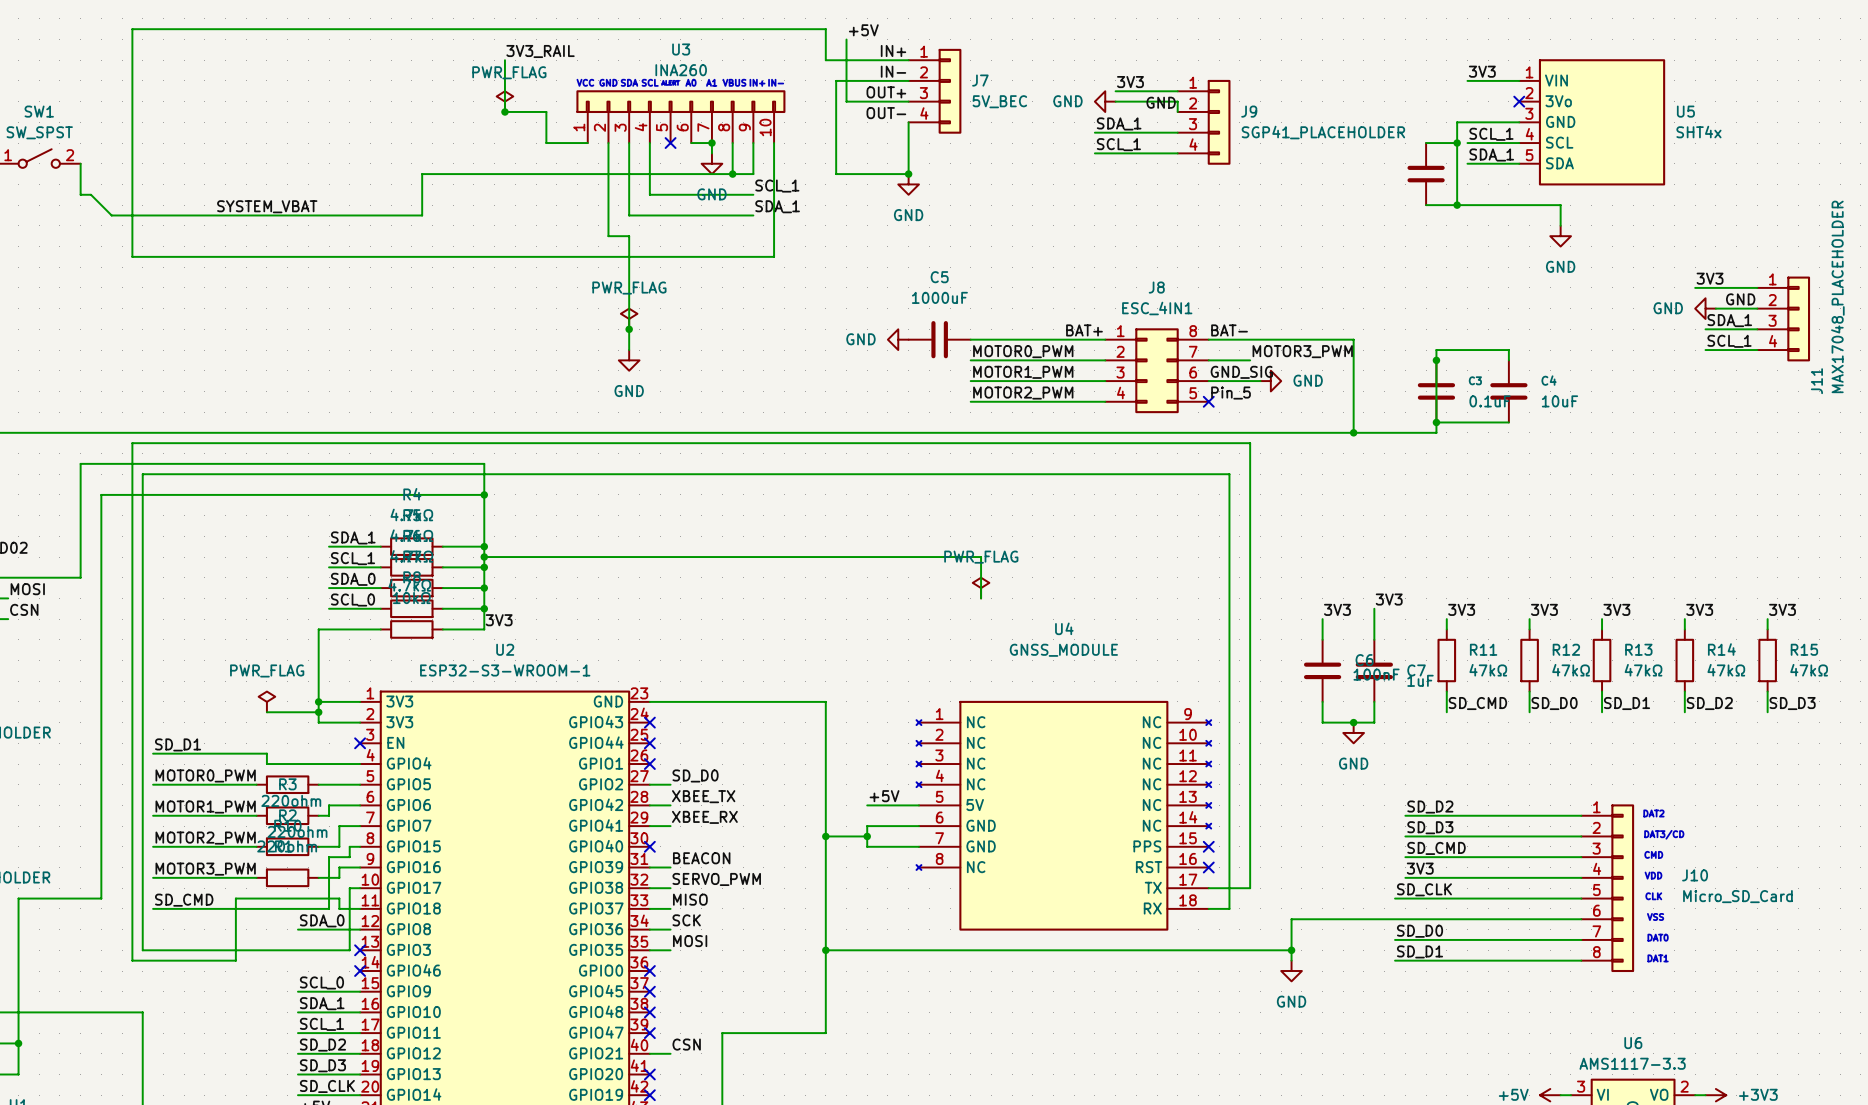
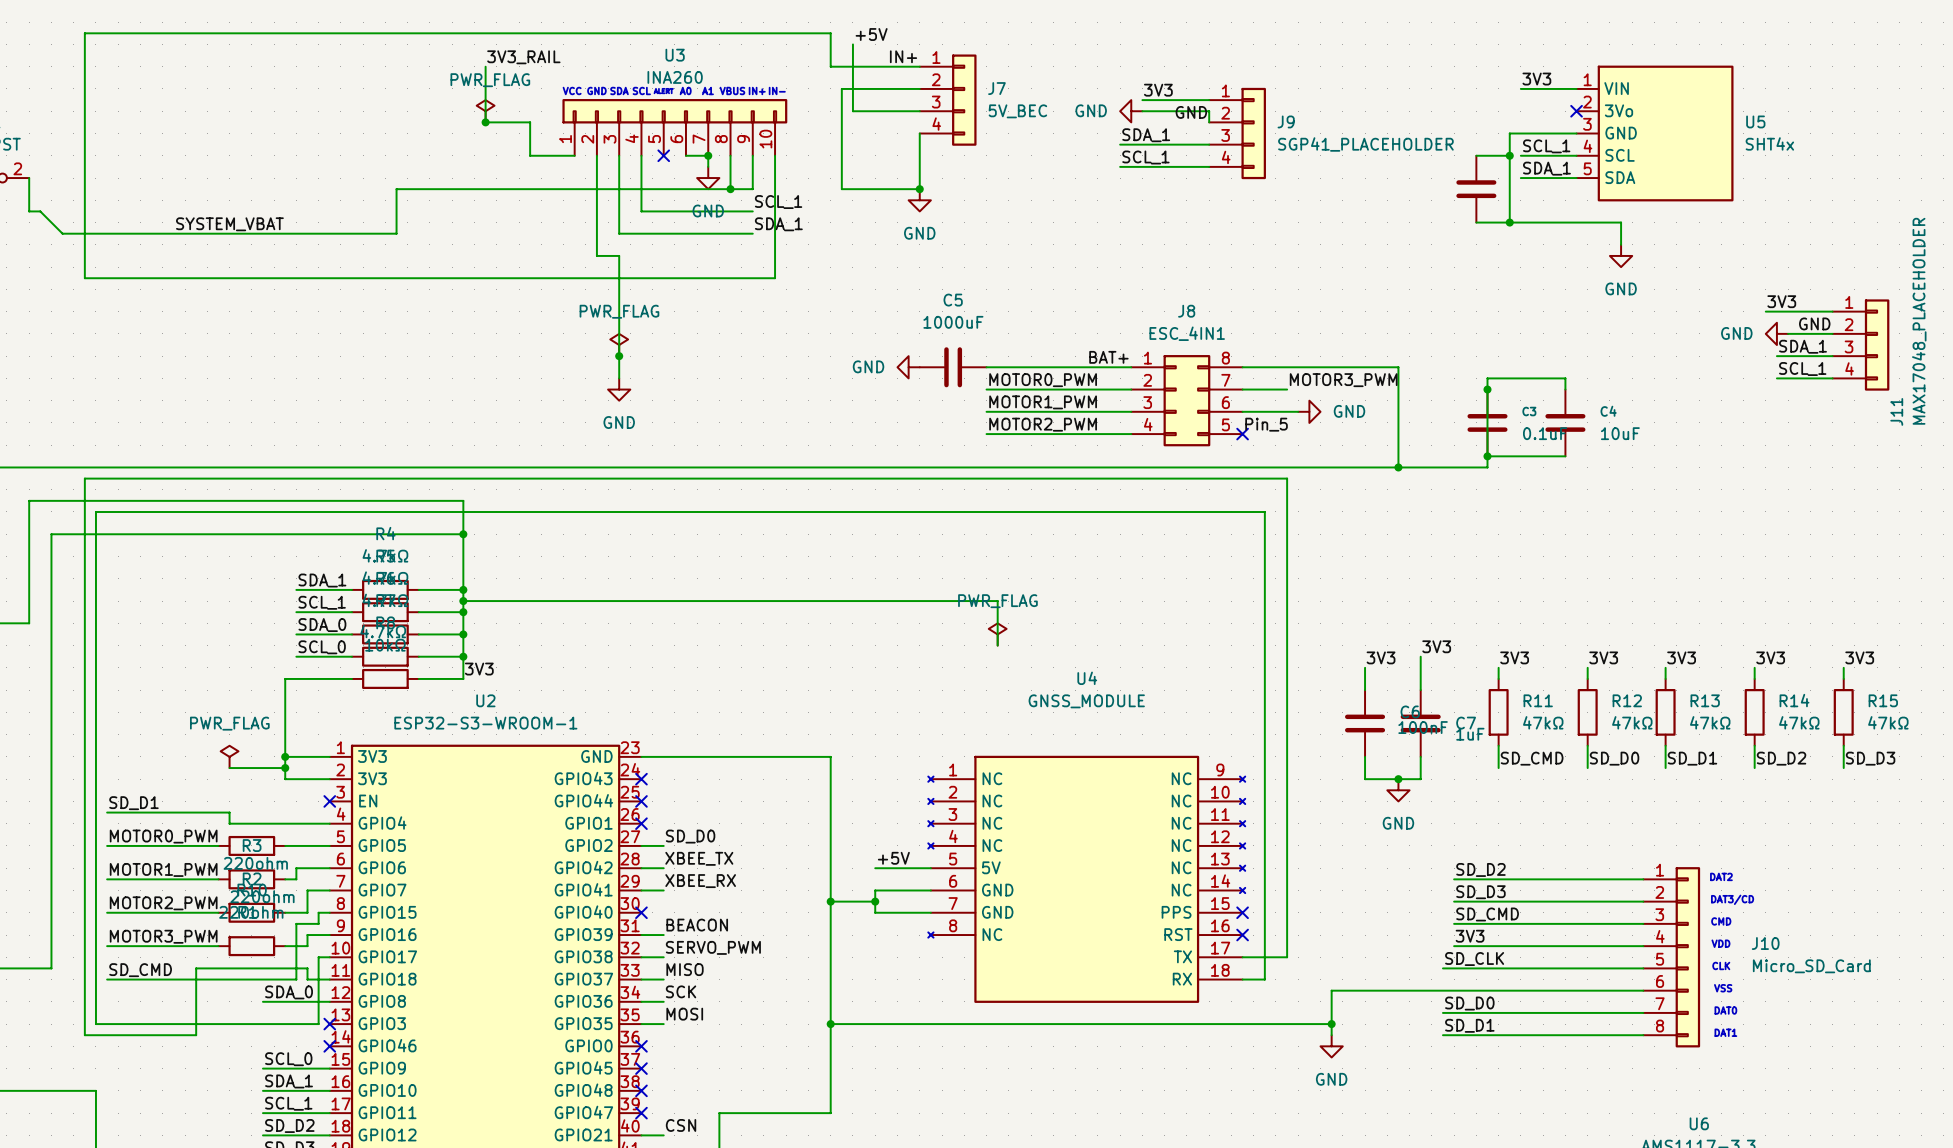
label: IN- (893, 71) -> none
label: OUT+ (886, 92) -> none
label: OUT- (886, 113) -> none
label: BAT- (1229, 330) -> none
label: GND_SIG (1241, 372) -> none

